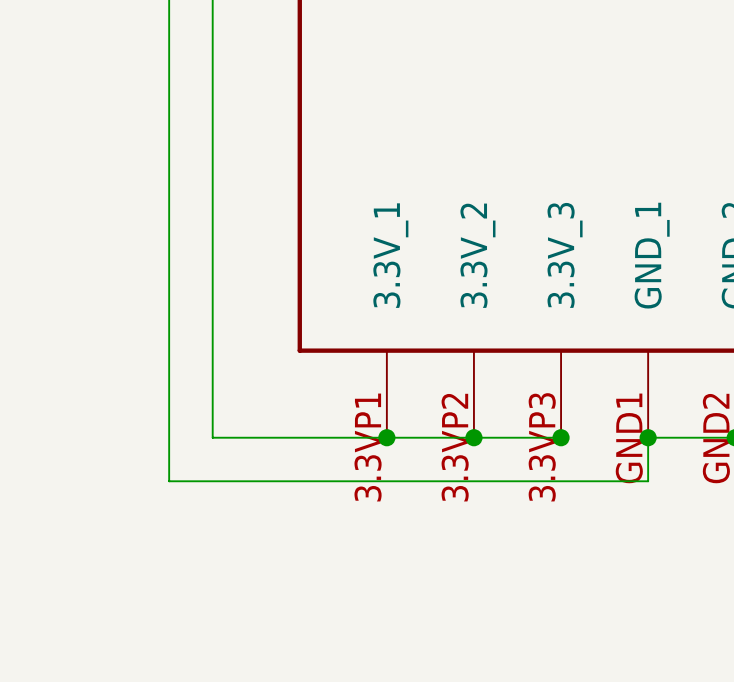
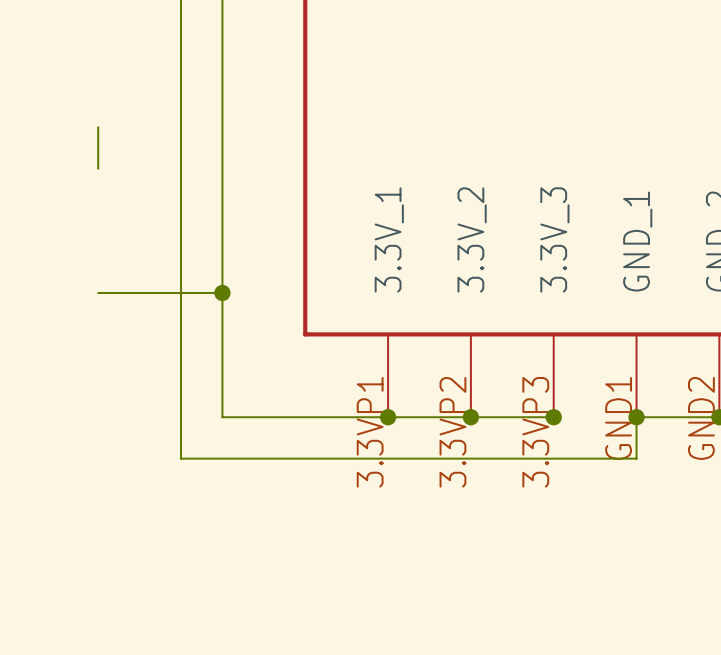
wire: none -> (98, 127) (98, 168)
wire: none -> (98, 292) (222, 292)
junction: none -> (222, 292)

